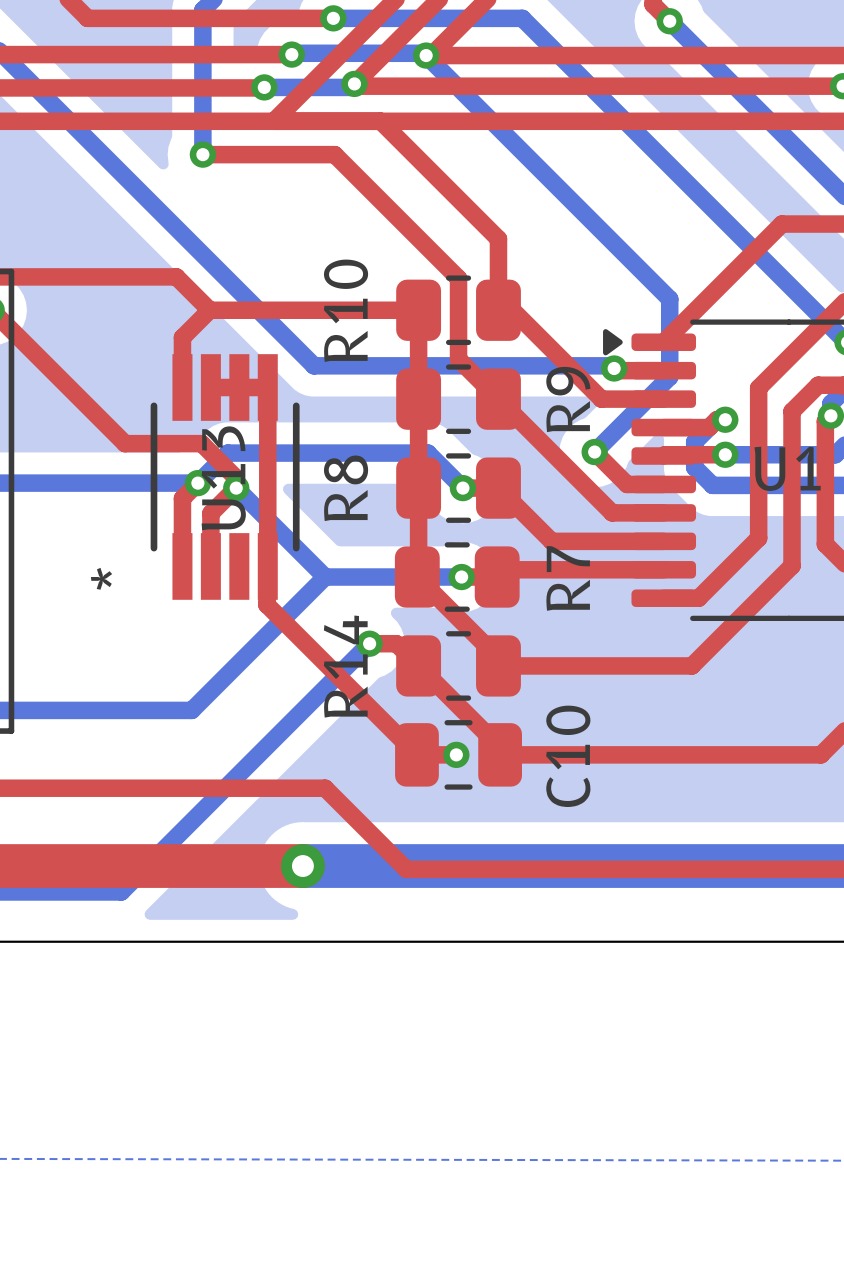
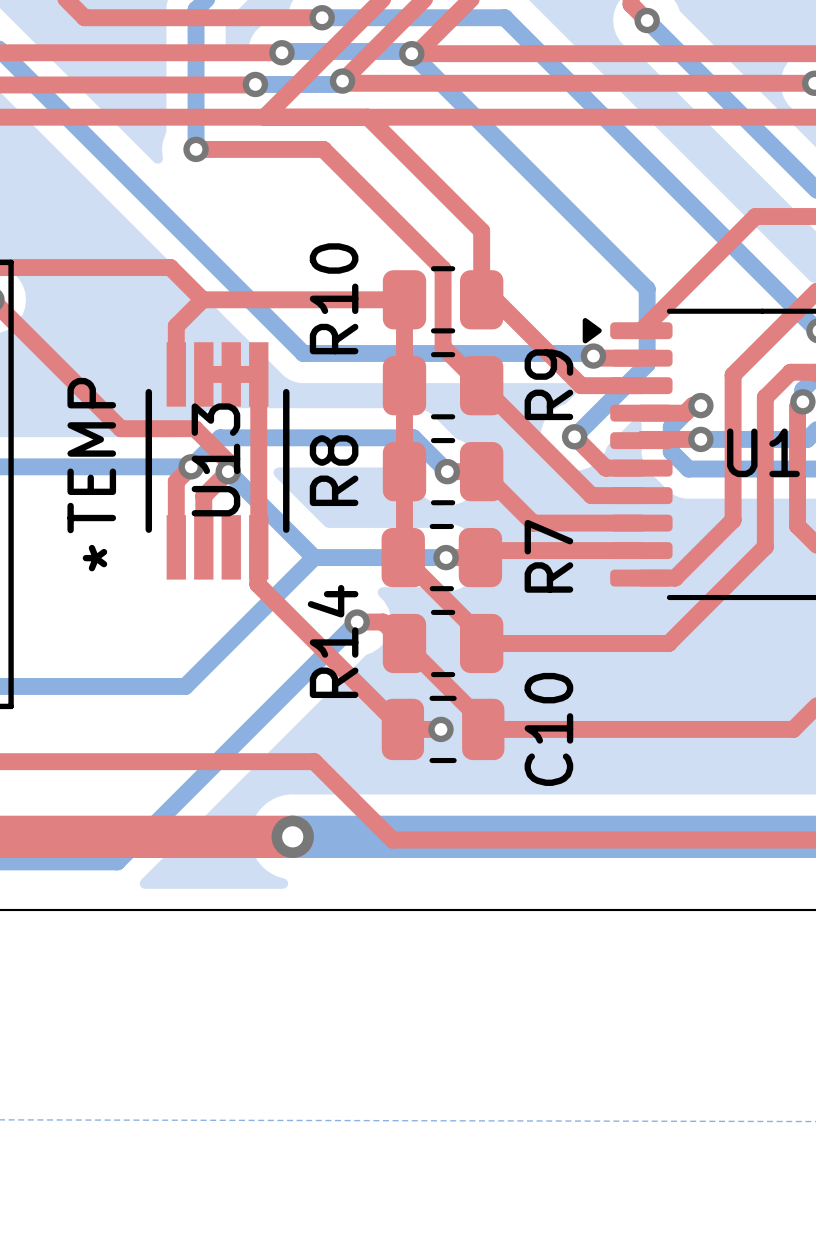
text: none -> TEMP (91, 455)

